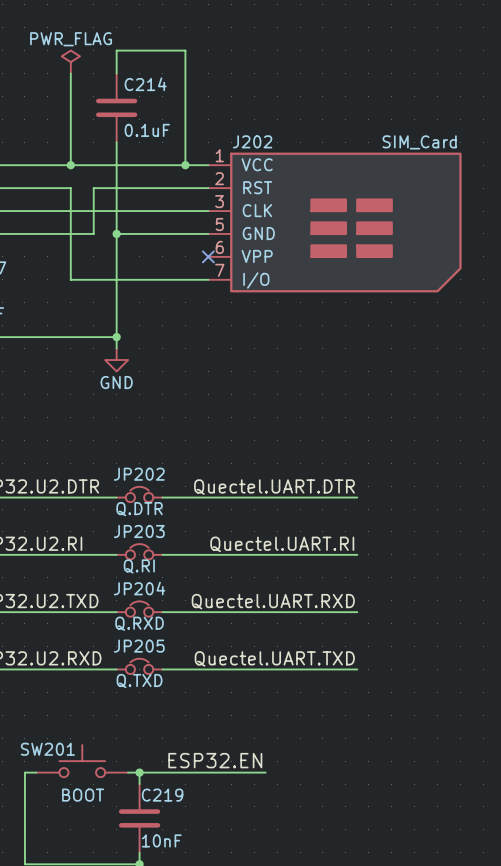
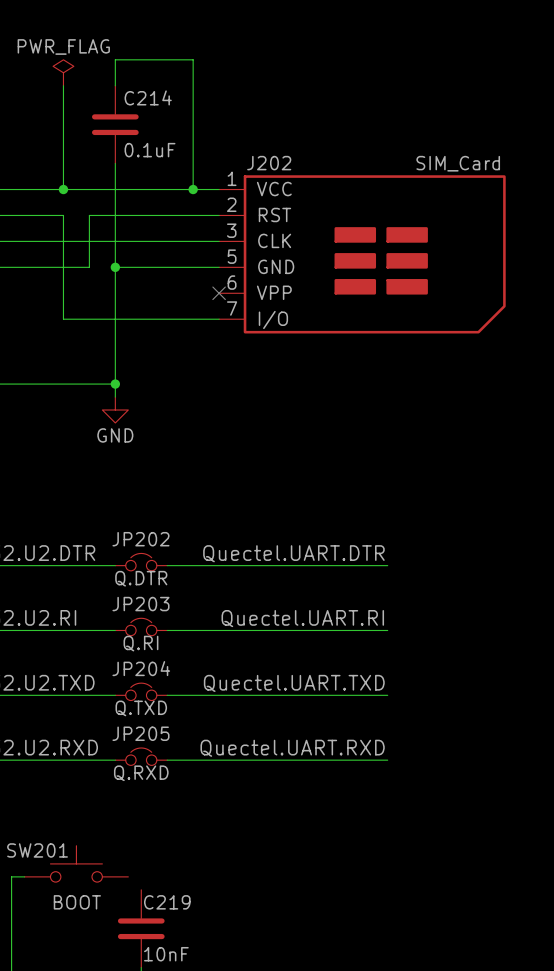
label: Quectel.UART.RXD (273, 601) -> Quectel.UART.TXD (294, 683)
JP204 value: Q.RXD (139, 623) -> Q.TXD (141, 708)
label: Quectel.UART.TXD (274, 658) -> Quectel.UART.RXD (292, 748)
JP205 value: Q.TXD (139, 681) -> Q.RXD (141, 773)
label: ESP32.EN (215, 760) -> none
wire: (128, 772) (265, 772) -> none
wire: (139, 772) (139, 784) -> none
junction: (139, 772) -> none

